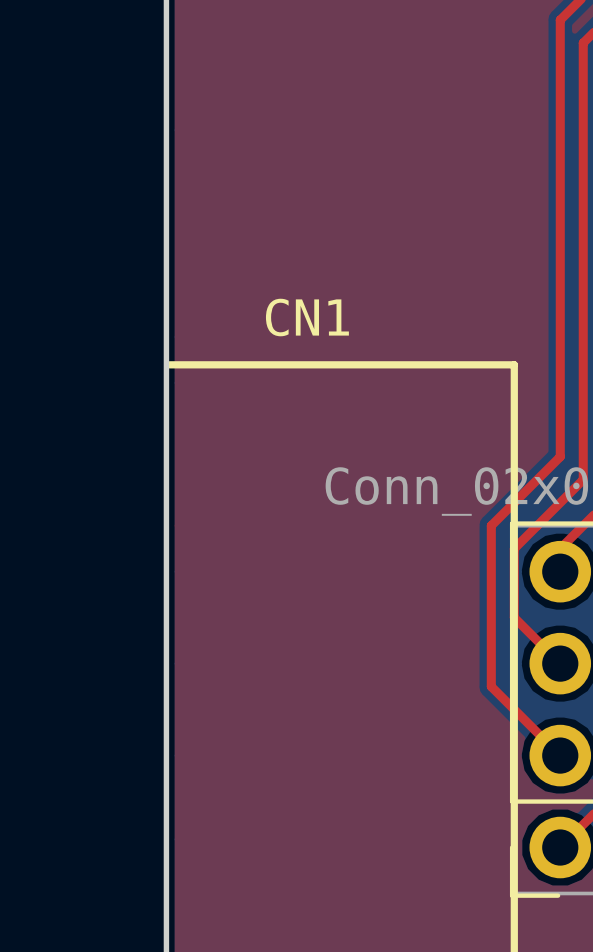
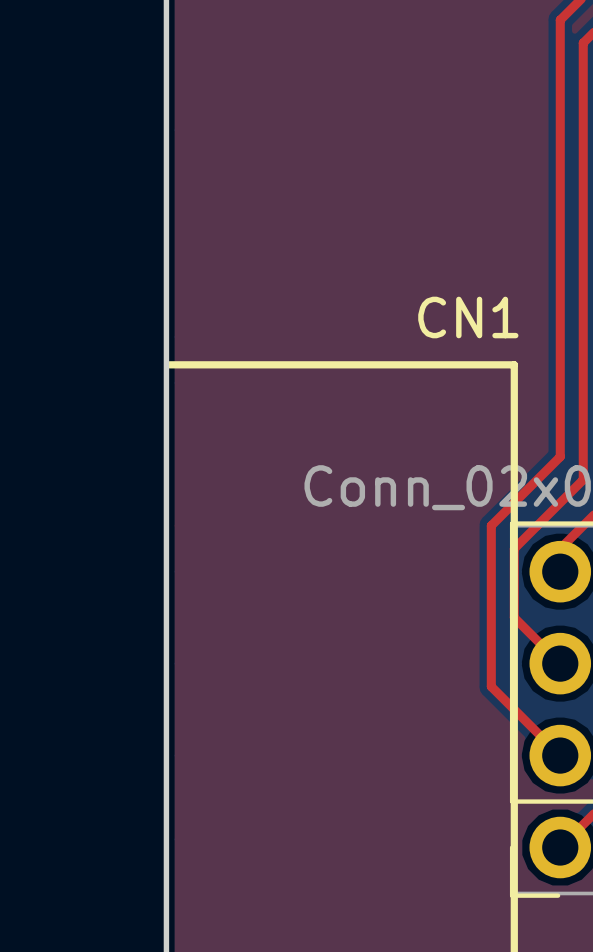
CN1 name position: CN1 (307, 317) -> CN1 (468, 317)

